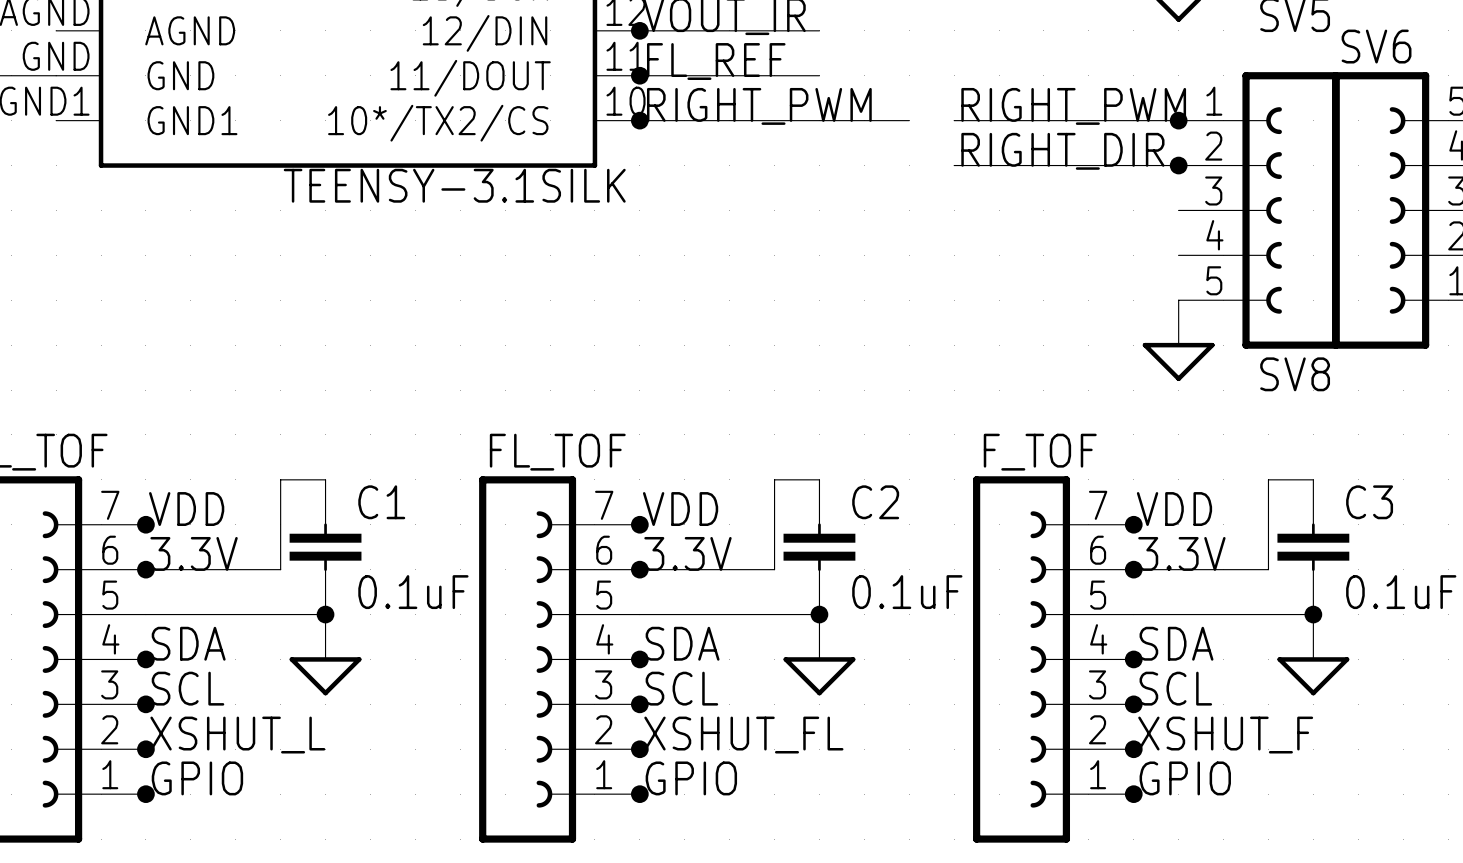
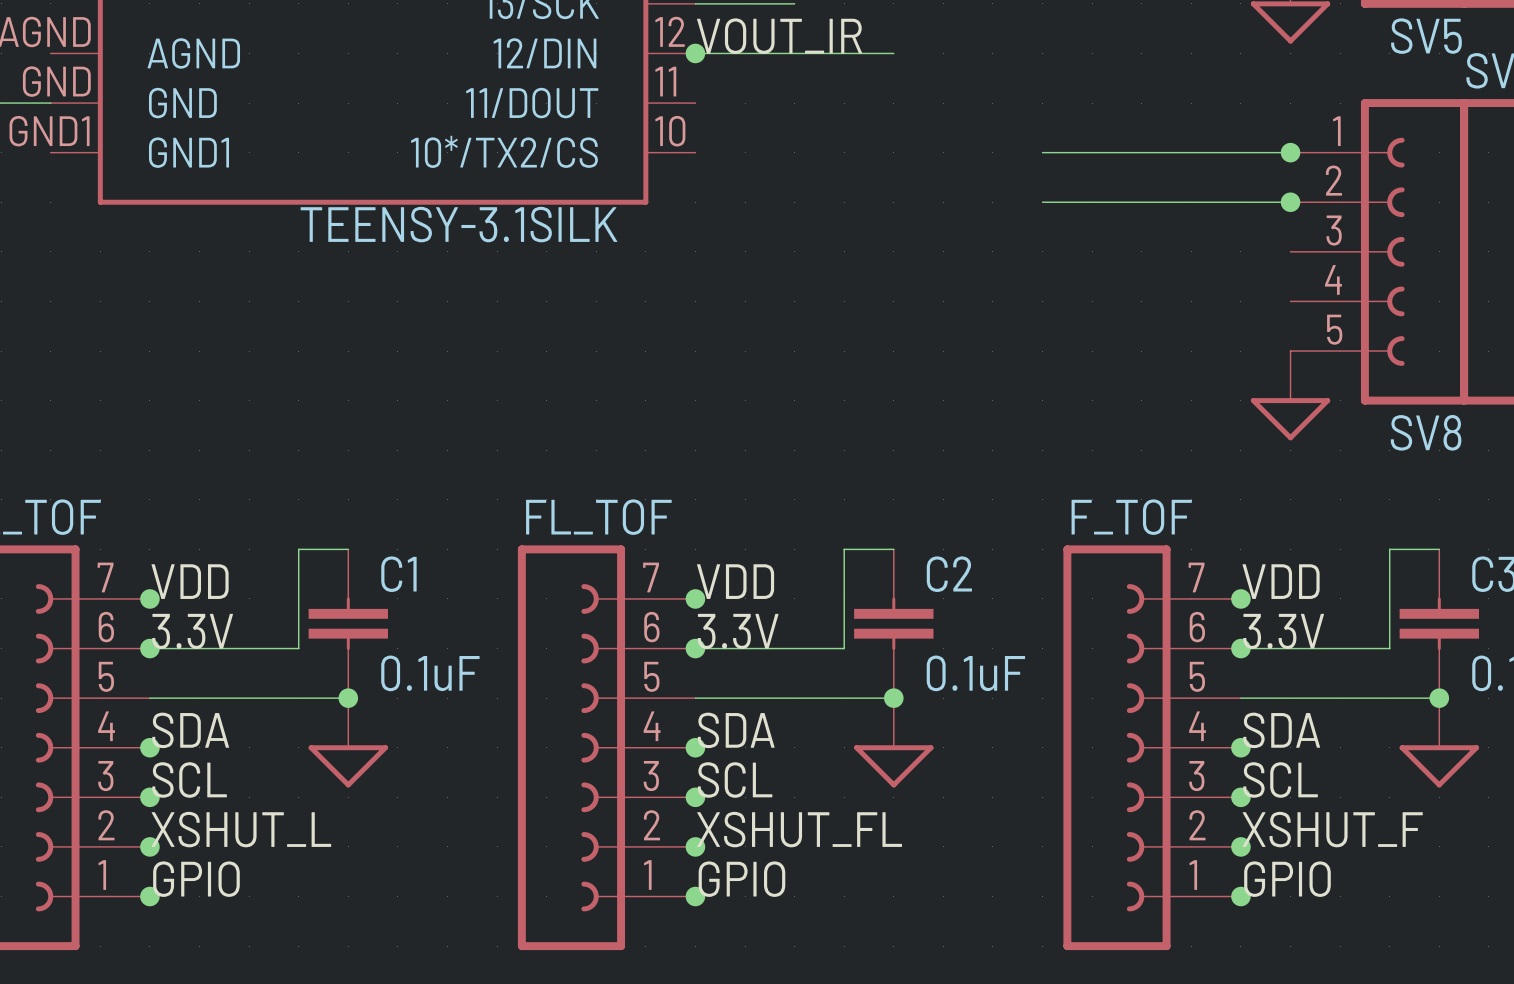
label: FL_REF (716, 61) -> none
wire: (639, 75) (819, 75) -> none
junction: (639, 75) -> none
label: RIGHT_PWM (759, 106) -> none
label: RIGHT_PWM (1073, 106) -> none
wire: (639, 120) (909, 120) -> none
junction: (639, 120) -> none
label: RIGHT_DIR (1062, 151) -> none

